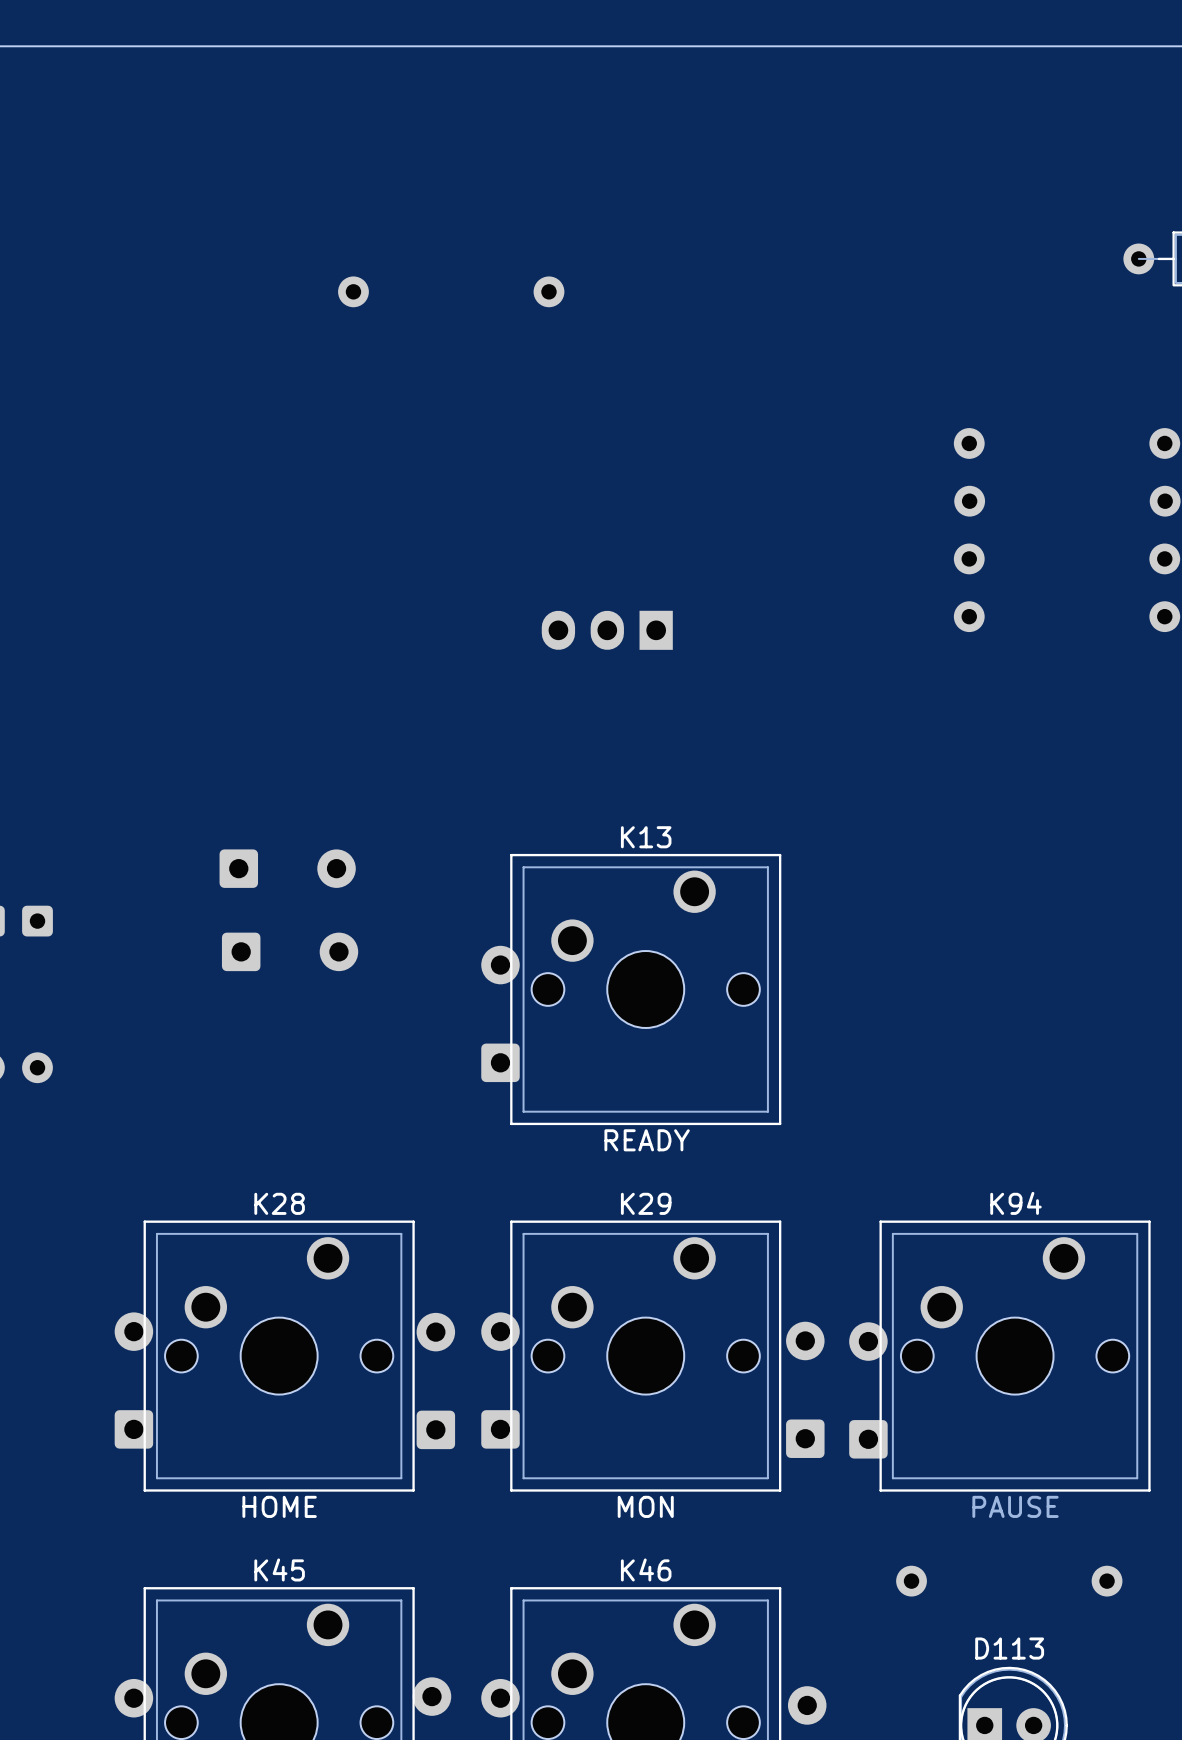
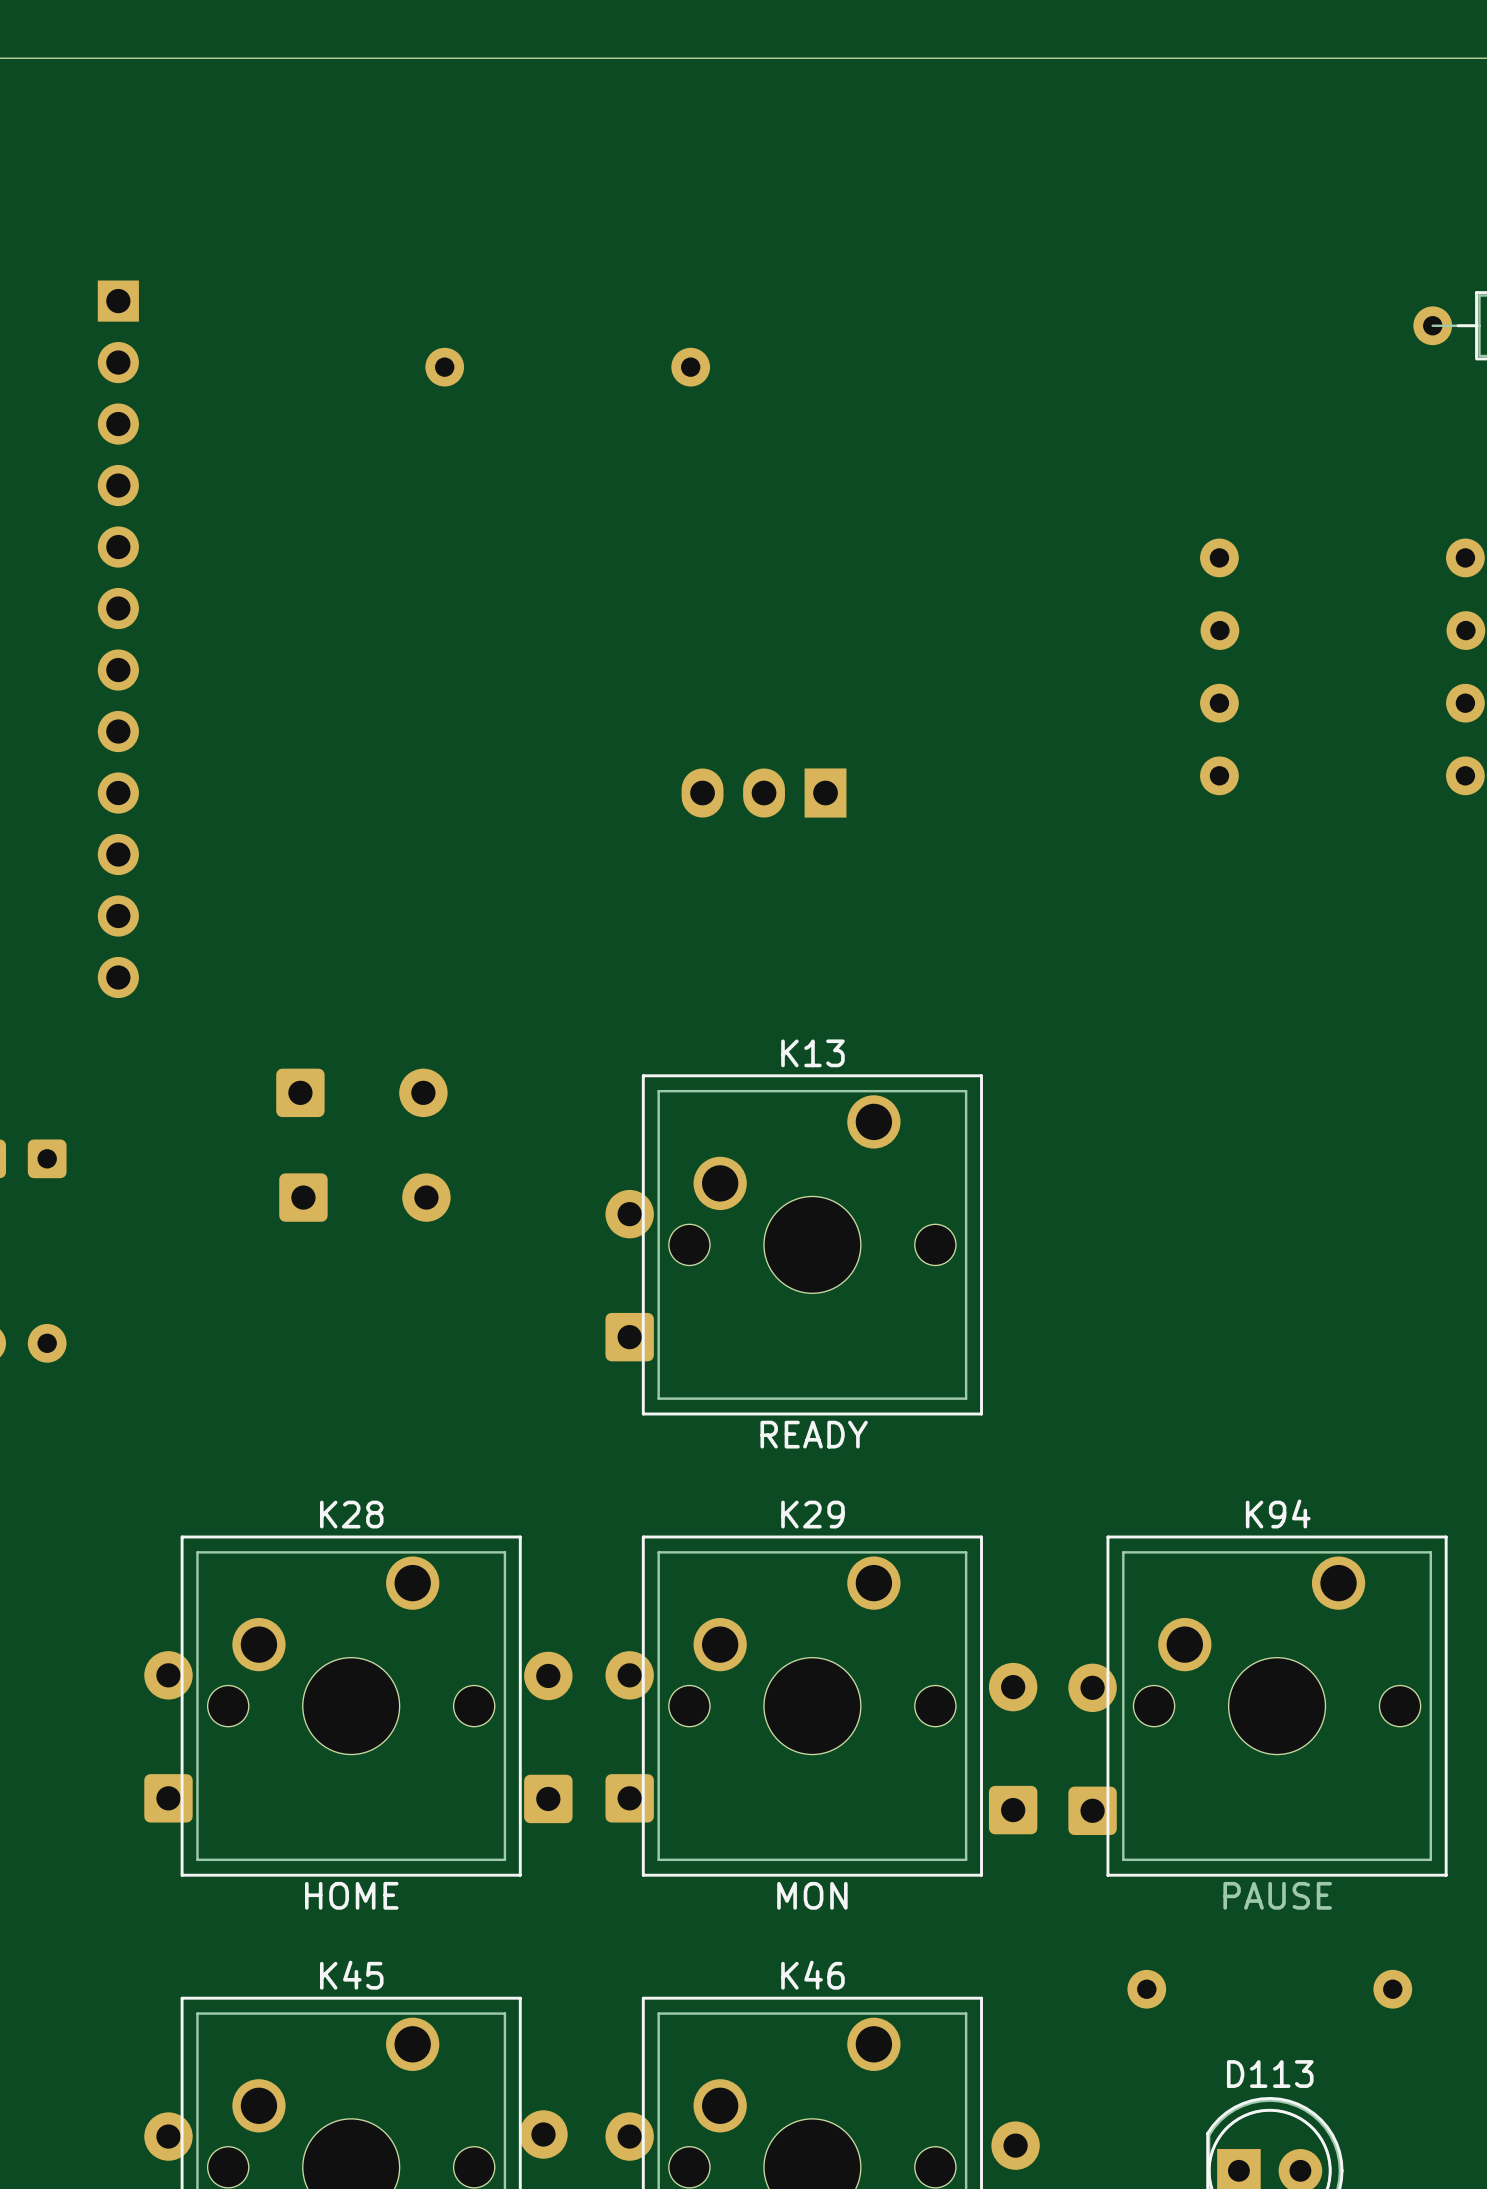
part: none -> (118, 639)

